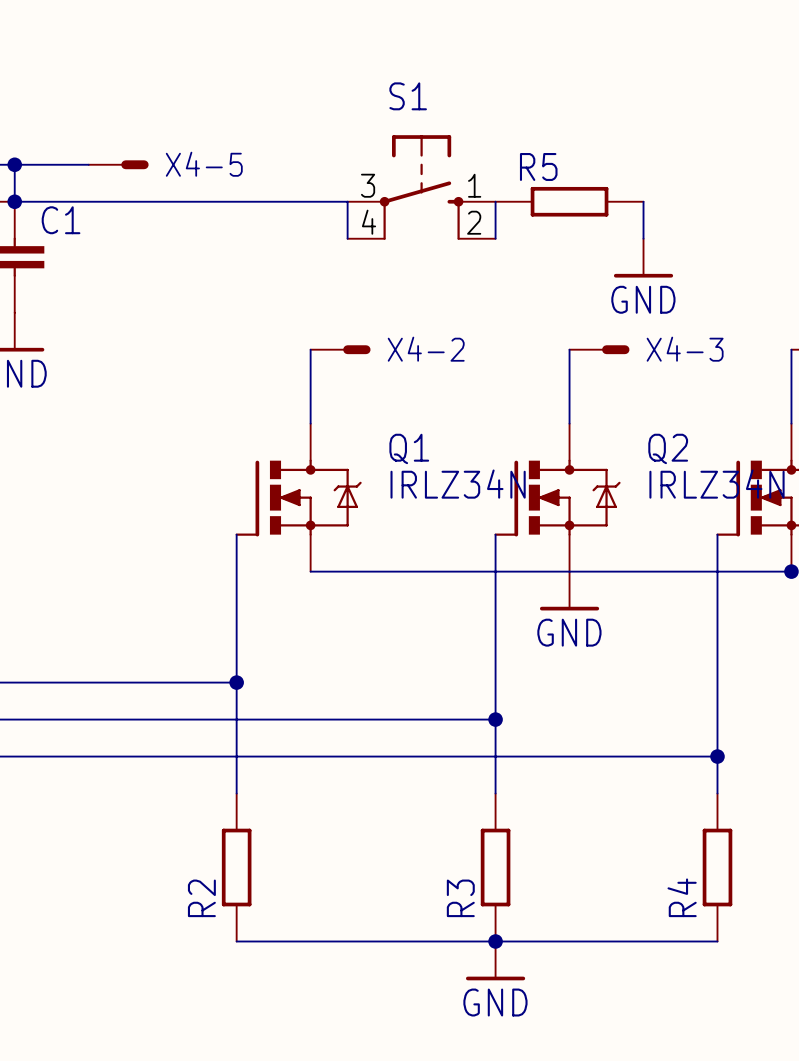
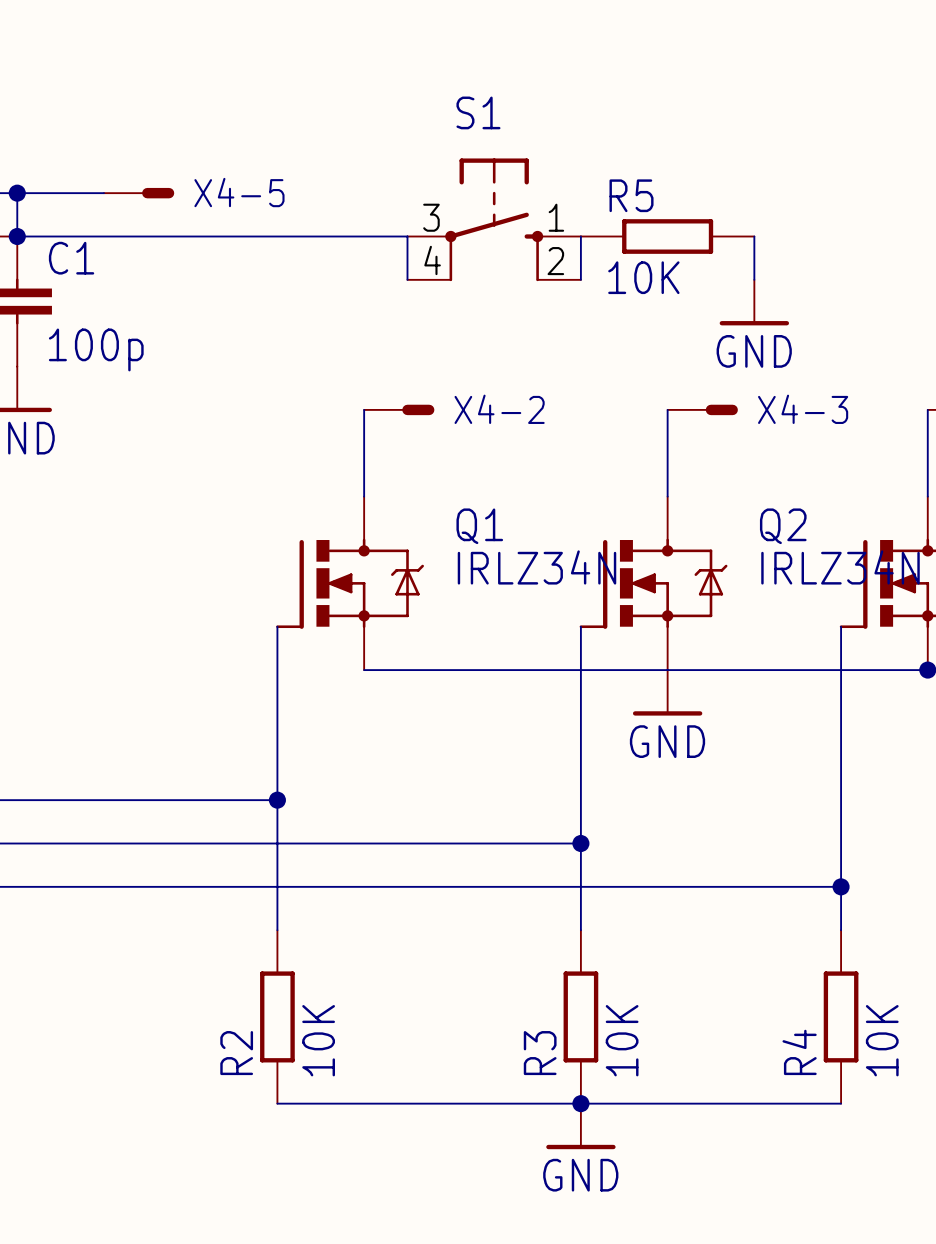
R5 value: none -> 10K (643, 277)
C1 value: none -> 100p (96, 349)
R2 value: none -> 10K (318, 1040)
R3 value: none -> 10K (622, 1040)
R4 value: none -> 10K (882, 1040)

